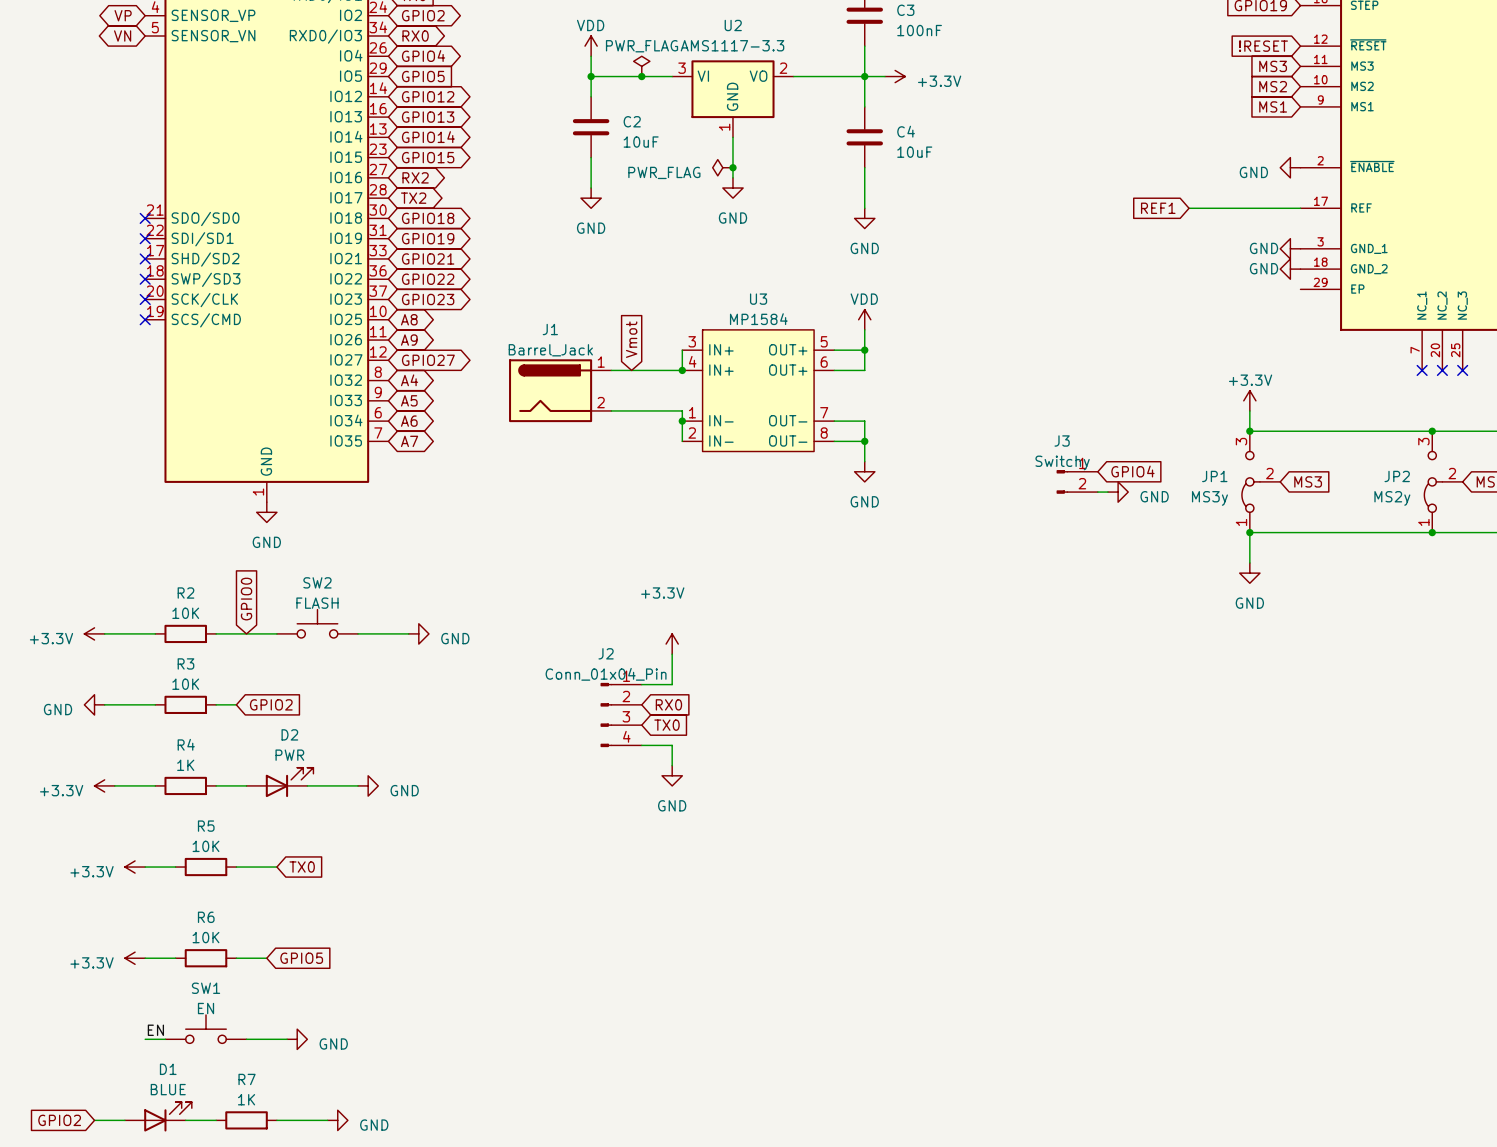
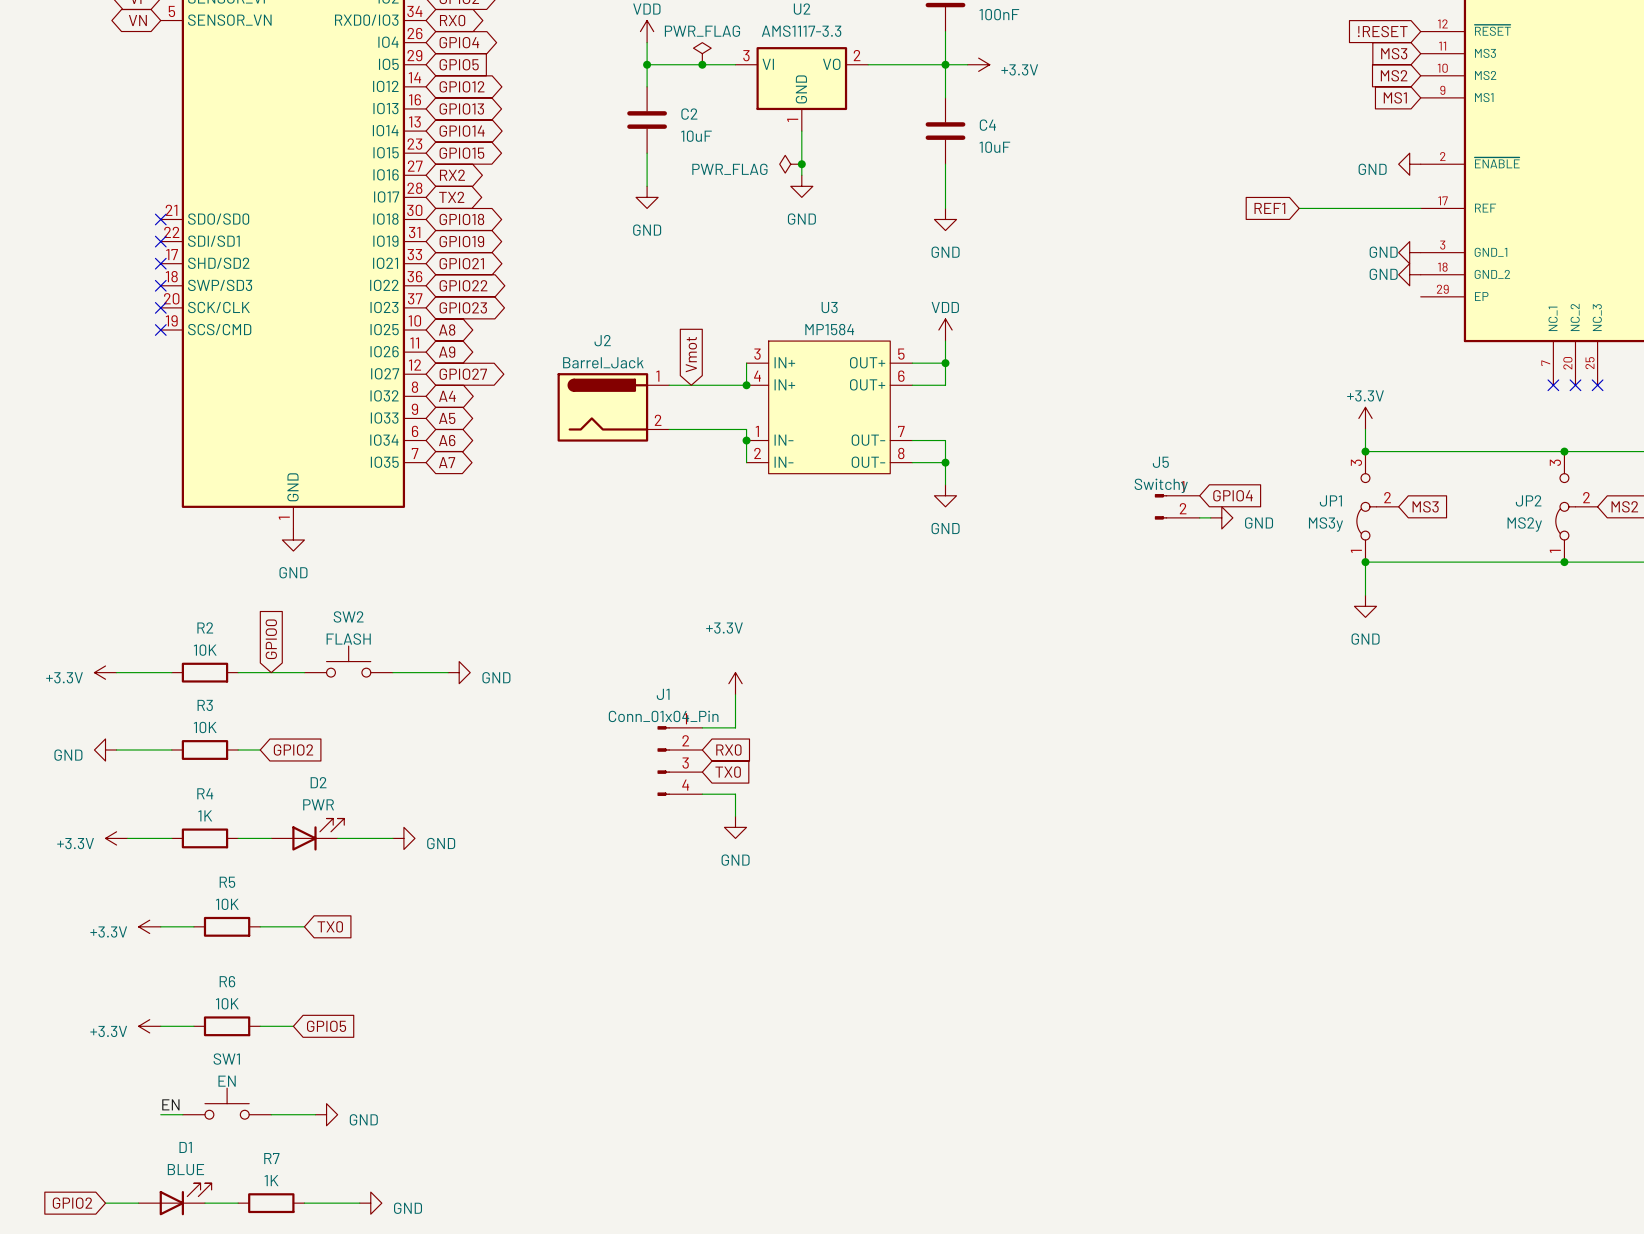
J1 name: J1 (550, 329) -> J2 (602, 340)
J3 name: J3 (1062, 440) -> J5 (1160, 462)
J2 name: J2 (606, 653) -> J1 (663, 694)

